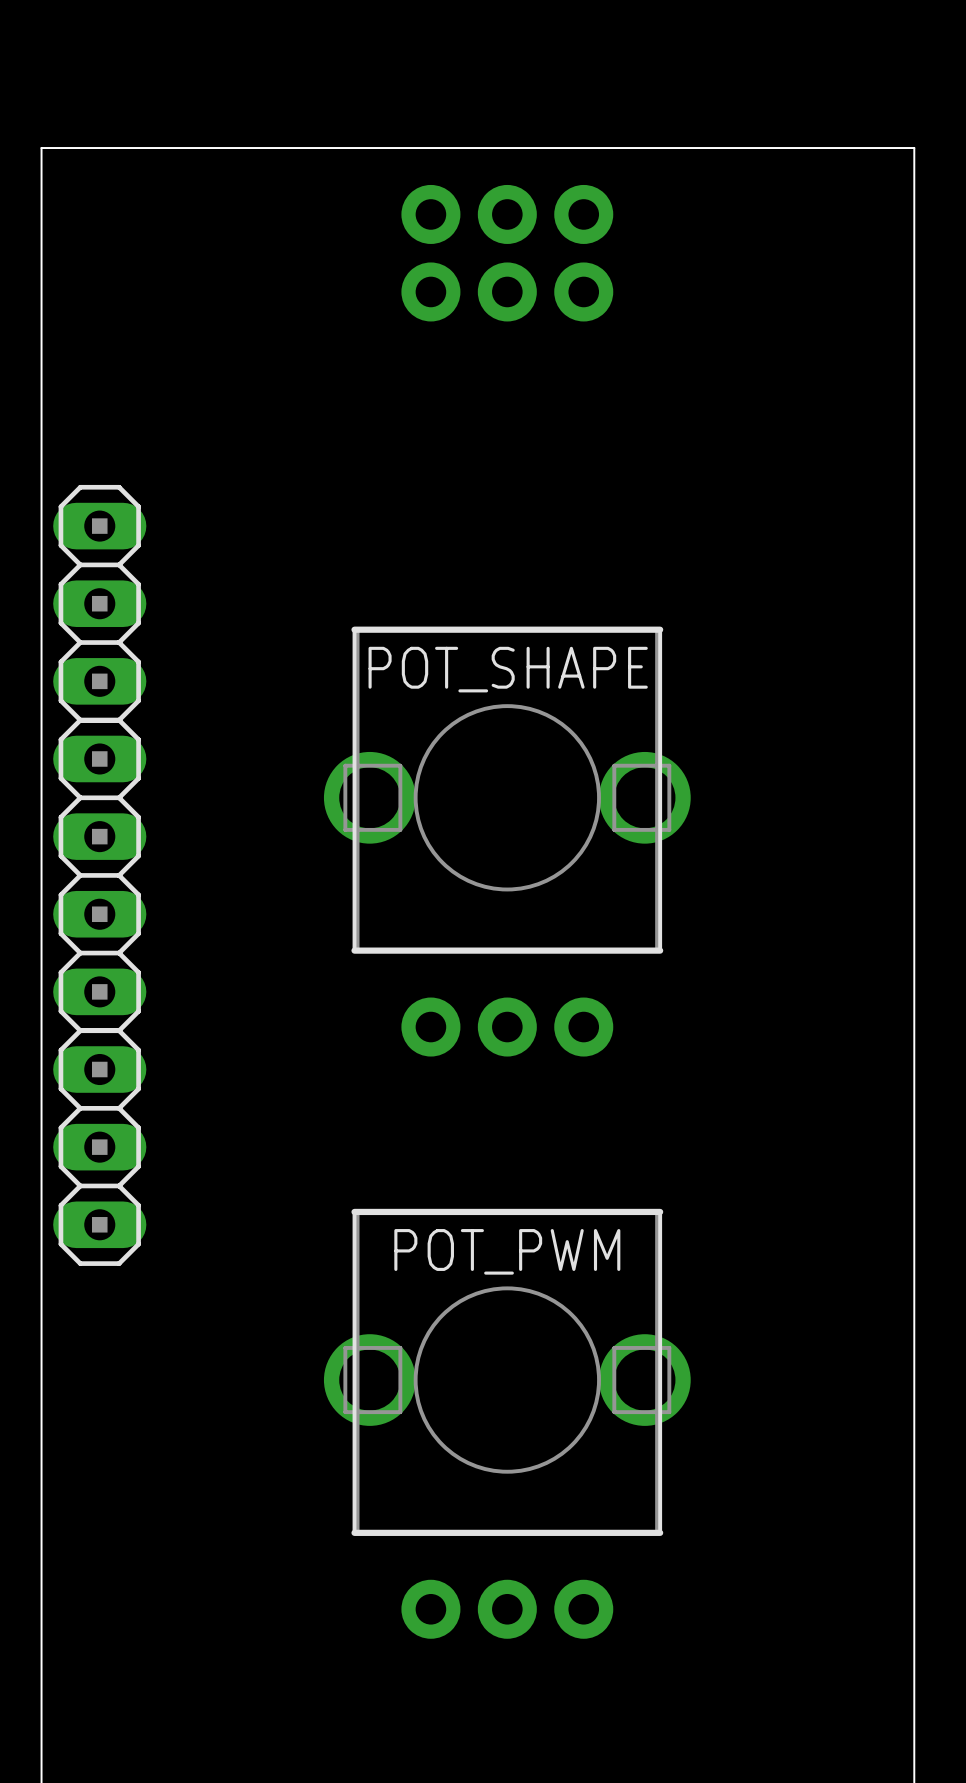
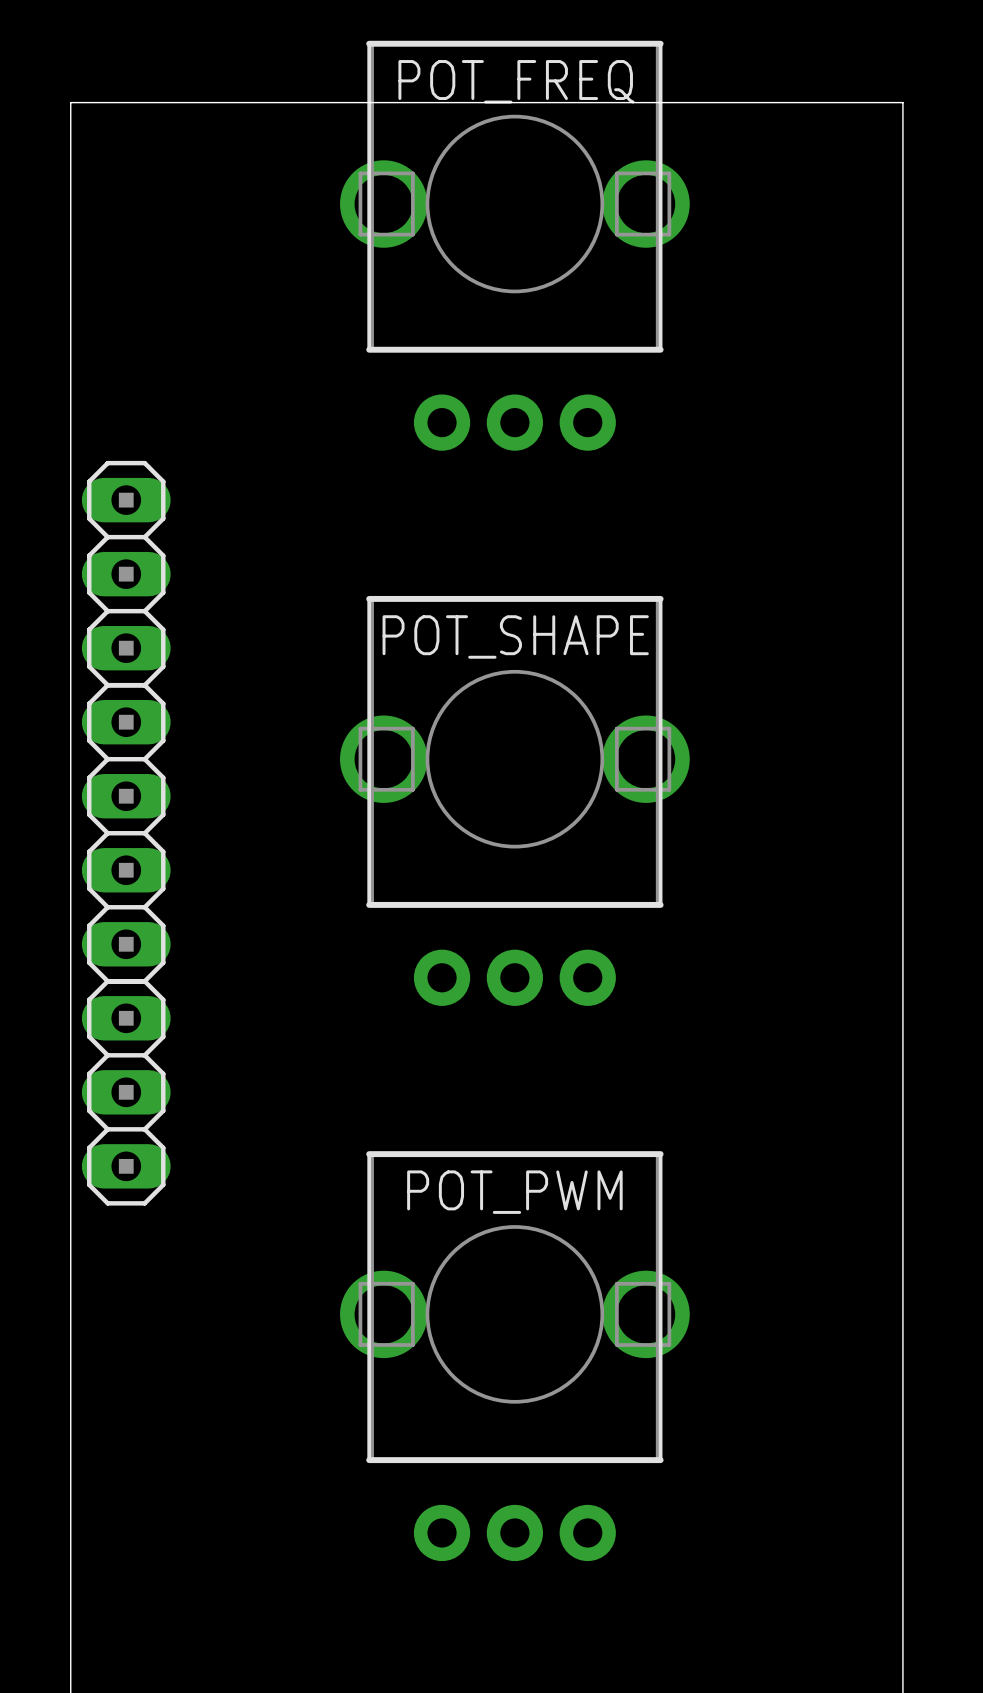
board edge: (41, 148) (914, 148) -> (70, 139) (70, 102) (902, 102) (902, 139)
part: (507, 253) -> none
POT_FREQ: none -> (514, 245)

